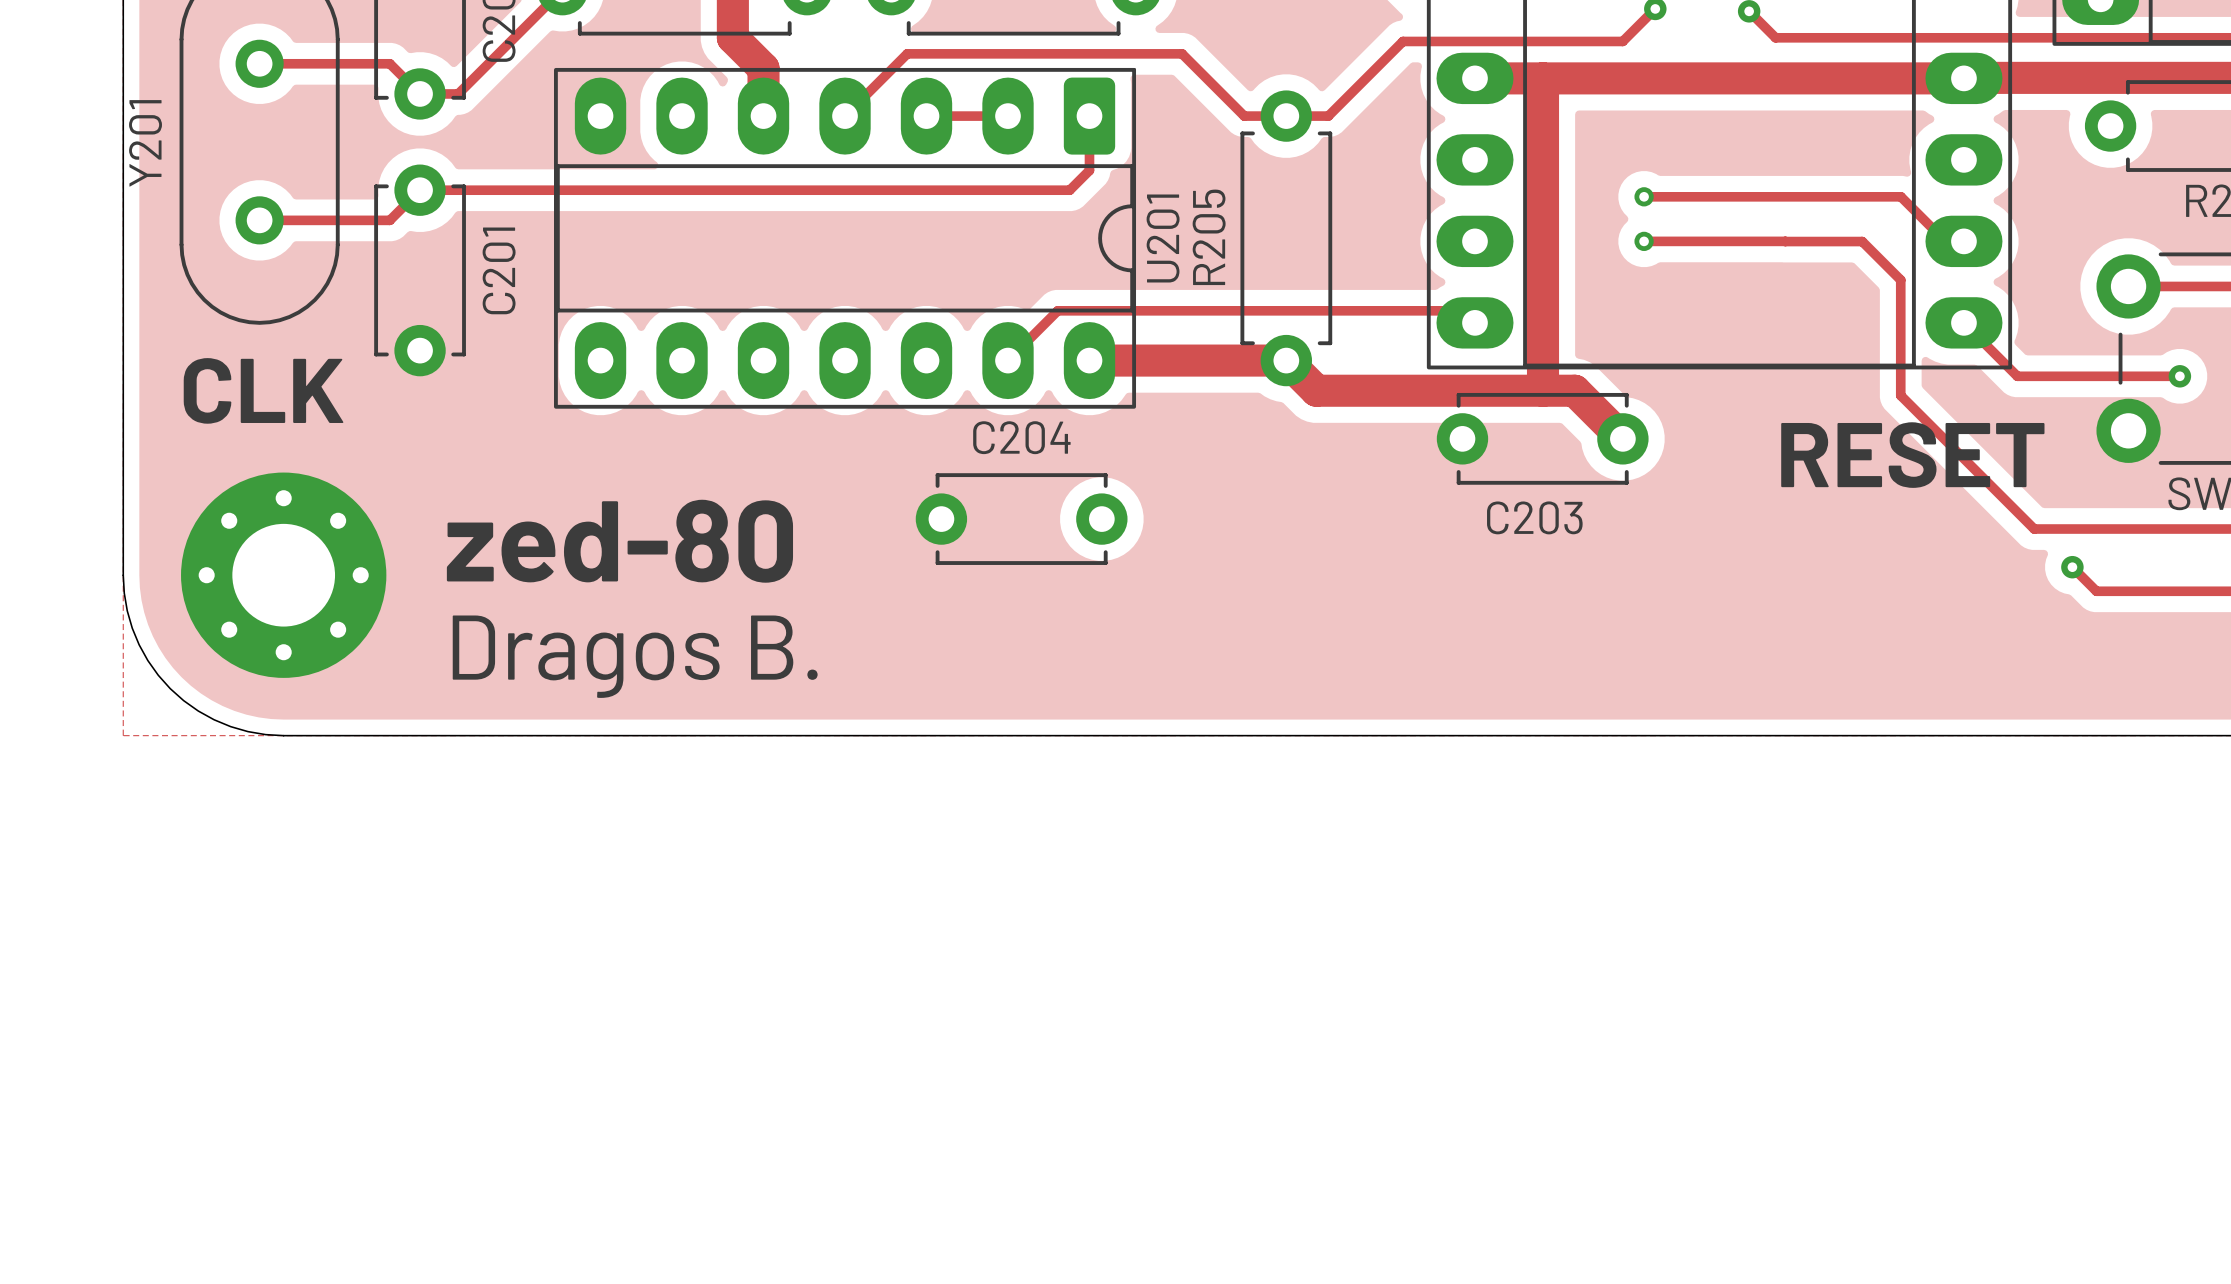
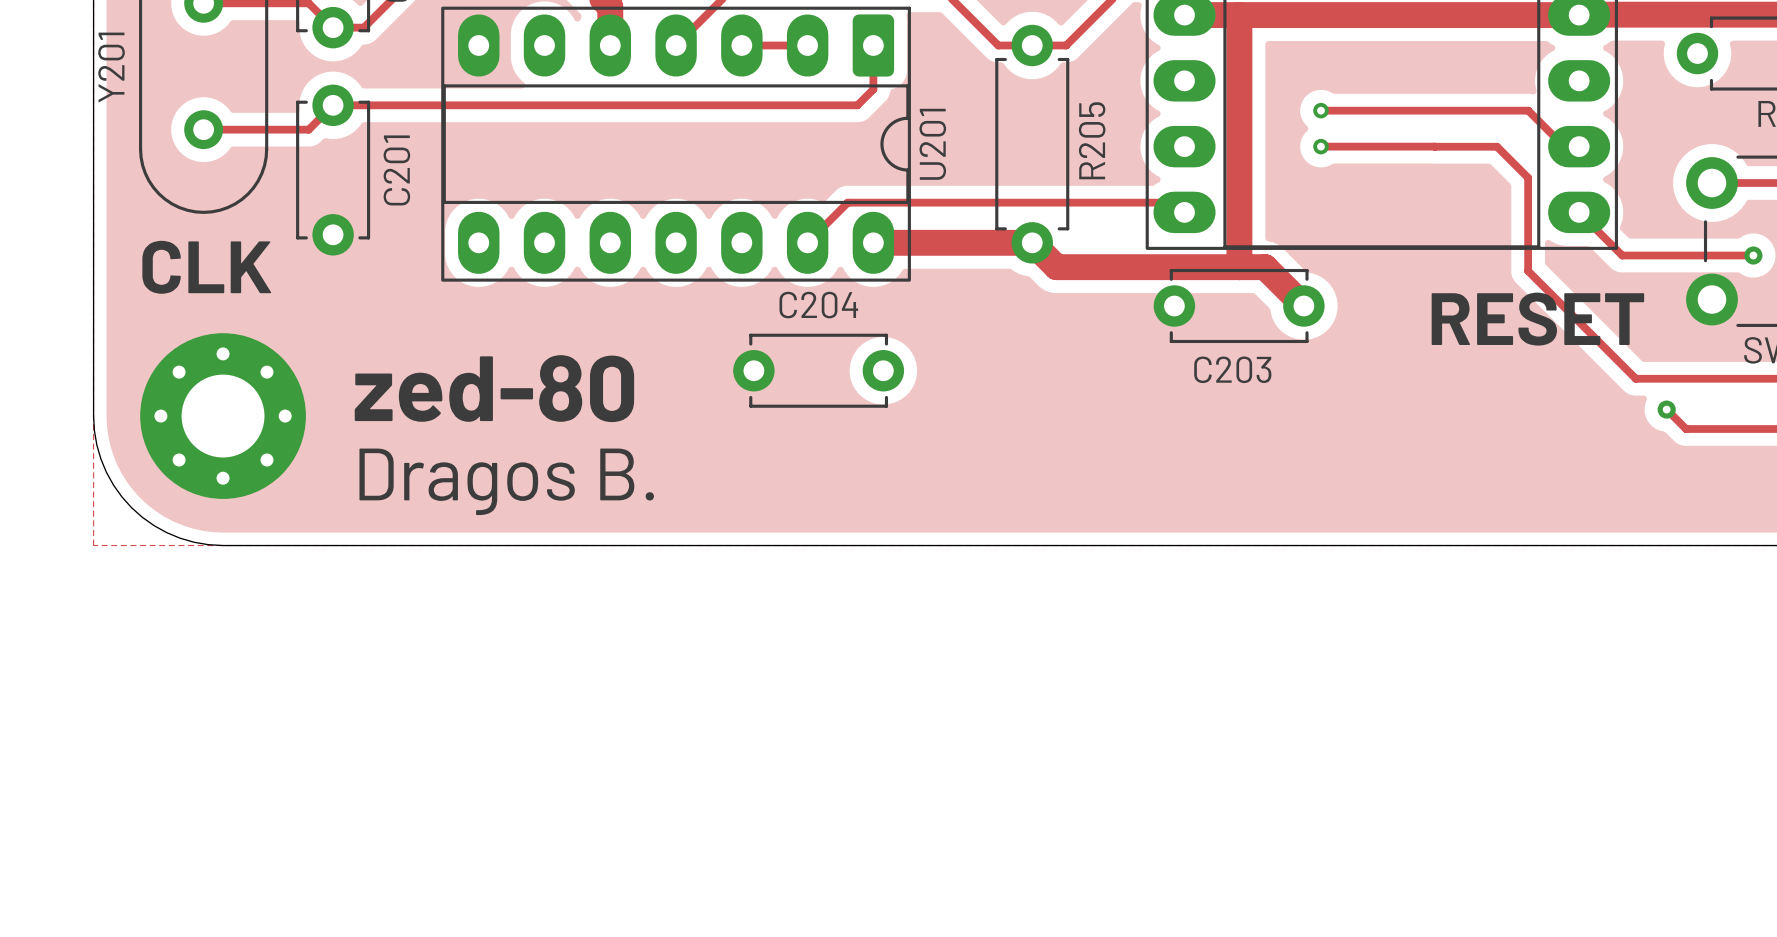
R205 name position: R205 (1209, 237) -> R205 (1092, 140)

